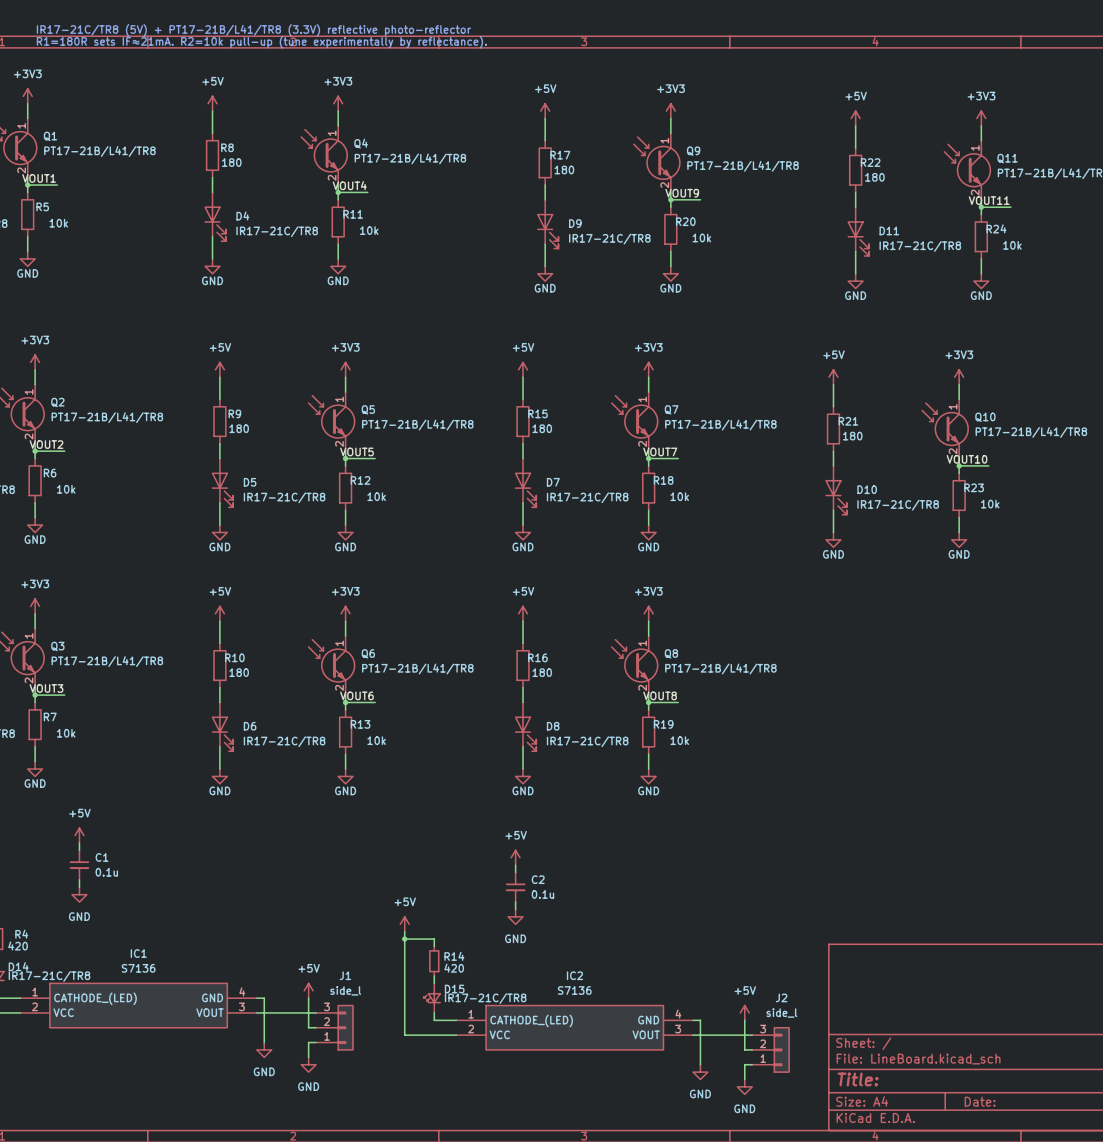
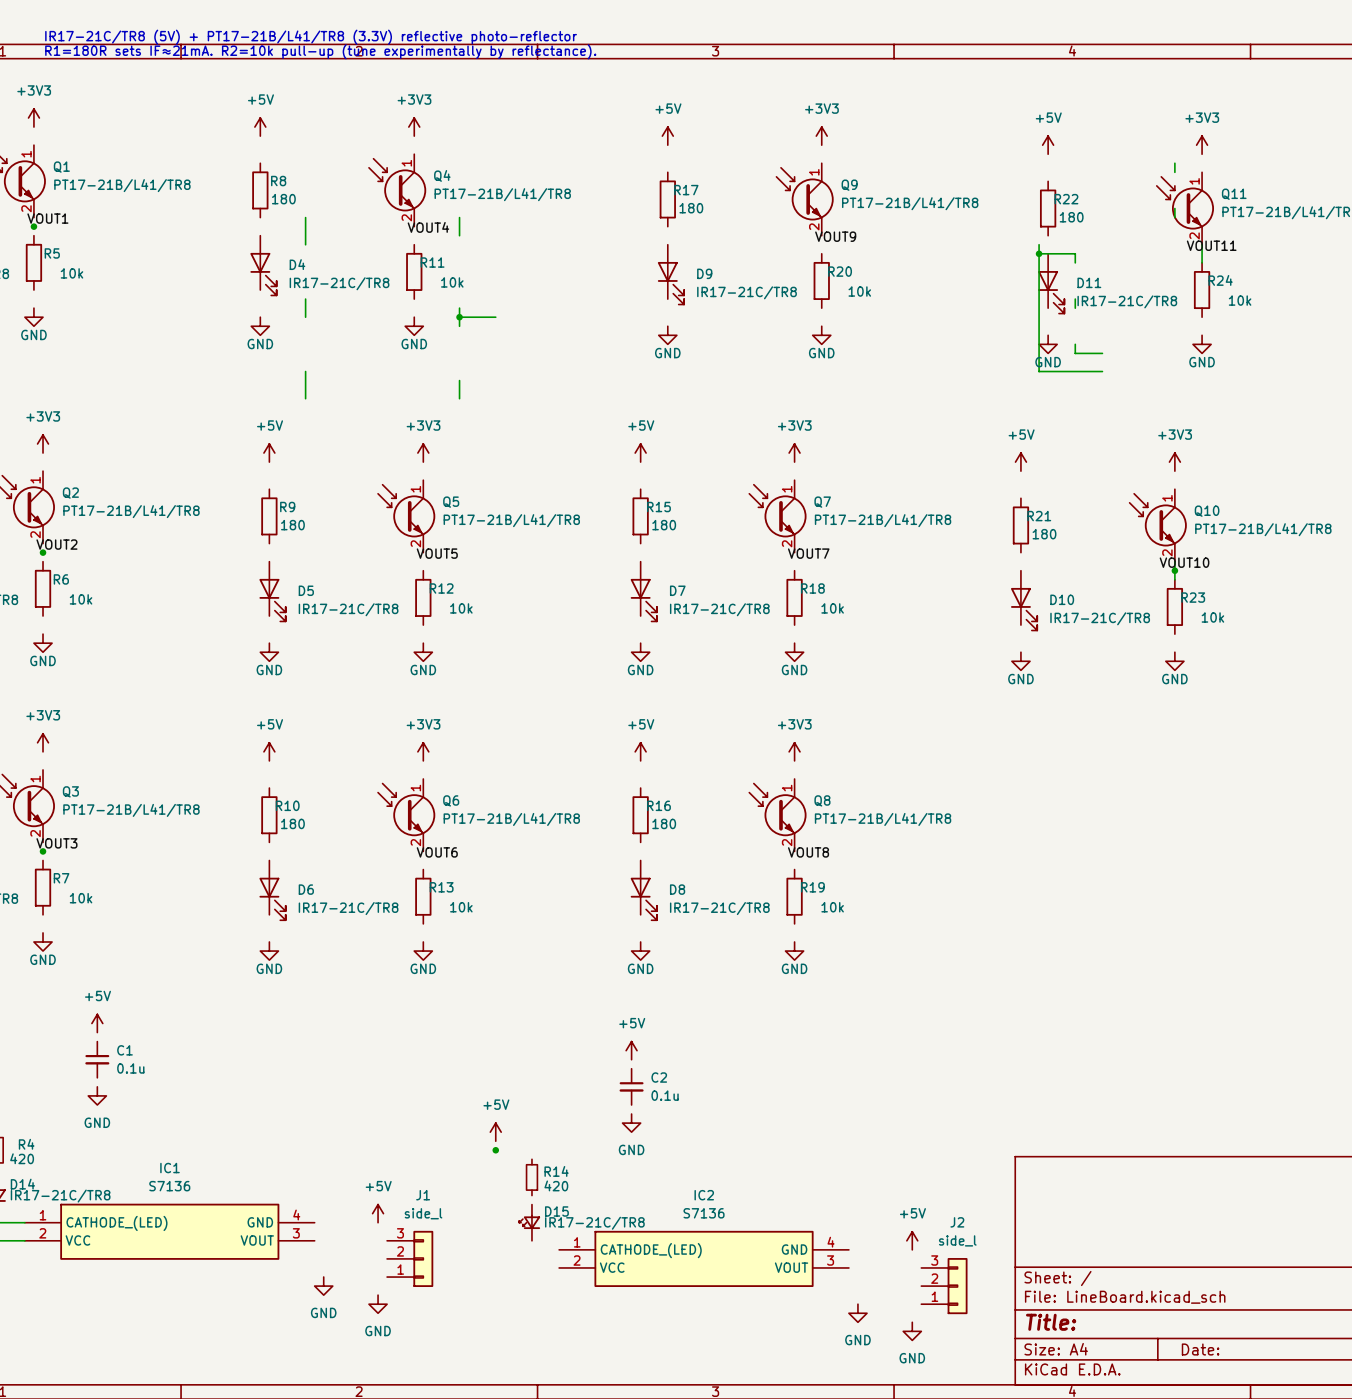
wire: (27, 103) (27, 118) -> none
wire: (212, 111) (212, 133) -> (305, 217) (305, 244)
wire: (338, 111) (338, 125) -> (459, 217) (459, 235)
wire: (545, 118) (545, 140) -> none
wire: (670, 118) (670, 133) -> none
wire: (855, 125) (855, 148) -> none
wire: (981, 125) (981, 140) -> none
wire: none -> (1174, 163) (1174, 172)
wire: none -> (1174, 208) (1174, 217)
wire: (27, 177) (27, 192) -> none
wire: (212, 177) (212, 192) -> (305, 299) (305, 317)
wire: (27, 185) (57, 185) -> none
wire: (338, 185) (338, 199) -> (459, 308) (459, 326)
wire: (545, 185) (545, 199) -> none
wire: (338, 192) (367, 192) -> (459, 317) (495, 317)
junction: (338, 192) -> none
wire: (670, 192) (670, 207) -> none
wire: (855, 192) (855, 207) -> none
wire: (670, 199) (700, 199) -> none
junction: (670, 199) -> none
wire: none -> (1039, 244) (1039, 371) (1102, 371)
wire: none -> (1039, 253) (1075, 253) (1075, 262)
junction: none -> (1039, 253)
wire: (981, 207) (1010, 207) -> none
junction: (981, 207) -> none
wire: (27, 236) (27, 251) -> none
wire: (212, 236) (212, 258) -> (305, 371) (305, 398)
wire: (338, 244) (338, 258) -> (459, 380) (459, 398)
wire: (545, 244) (545, 266) -> none
wire: none -> (1075, 299) (1075, 308)
wire: (670, 251) (670, 266) -> none
wire: (855, 251) (855, 273) -> none
junction: none -> (459, 317)
wire: (981, 258) (981, 273) -> none
wire: none -> (1075, 344) (1075, 353) (1102, 353)
wire: (35, 369) (35, 384) -> none
wire: (219, 377) (219, 399) -> none
wire: (345, 377) (345, 392) -> none
wire: (523, 377) (523, 399) -> none
wire: (648, 377) (648, 392) -> none
wire: (833, 384) (833, 406) -> none
wire: (959, 384) (959, 399) -> none
wire: (35, 443) (35, 458) -> none
wire: (219, 443) (219, 458) -> none
wire: (523, 443) (523, 458) -> none
wire: (35, 451) (64, 451) -> none
wire: (345, 451) (345, 465) -> none
wire: (648, 451) (648, 465) -> none
wire: (833, 451) (833, 465) -> none
wire: (345, 458) (375, 458) -> none
junction: (345, 458) -> none
wire: (648, 458) (678, 458) -> none
junction: (648, 458) -> none
wire: (959, 465) (988, 465) -> none
wire: (35, 502) (35, 517) -> none
wire: (219, 502) (219, 525) -> none
wire: (523, 502) (523, 525) -> none
wire: (345, 510) (345, 525) -> none
wire: (648, 510) (648, 525) -> none
wire: (833, 510) (833, 532) -> none
wire: (959, 517) (959, 532) -> none
wire: (35, 613) (35, 628) -> none
wire: (219, 621) (219, 643) -> none
wire: (345, 621) (345, 635) -> none
wire: (523, 621) (523, 643) -> none
wire: (648, 621) (648, 635) -> none
wire: (35, 687) (35, 702) -> none
wire: (219, 687) (219, 702) -> none
wire: (523, 687) (523, 702) -> none
wire: (35, 695) (64, 695) -> none
wire: (345, 695) (345, 709) -> none
wire: (648, 695) (648, 709) -> none
wire: (345, 702) (375, 702) -> none
junction: (345, 702) -> none
wire: (648, 702) (678, 702) -> none
junction: (648, 702) -> none
wire: (35, 746) (35, 761) -> none
wire: (219, 746) (219, 769) -> none
wire: (523, 746) (523, 769) -> none
wire: (345, 754) (345, 769) -> none
wire: (648, 754) (648, 769) -> none
wire: (79, 842) (79, 850) -> none
wire: (515, 865) (515, 872) -> none
wire: (79, 879) (79, 887) -> none
wire: (515, 902) (515, 909) -> none
wire: (404, 931) (404, 1035) (456, 1035) -> none
wire: (404, 939) (434, 939) (434, 946) -> none
wire: (434, 976) (434, 983) -> none
wire: (256, 998) (264, 998) (264, 1042) -> none
wire: (308, 998) (308, 1027) (316, 1027) -> none
wire: (256, 1012) (316, 1012) -> none
wire: (434, 1012) (434, 1020) (456, 1020) -> none
wire: (693, 1020) (700, 1020) (700, 1064) -> none
wire: (744, 1020) (744, 1049) (752, 1049) -> none
wire: (693, 1035) (752, 1035) -> none
wire: (316, 1042) (308, 1042) (308, 1057) -> none
wire: (752, 1064) (744, 1064) (744, 1079) -> none

